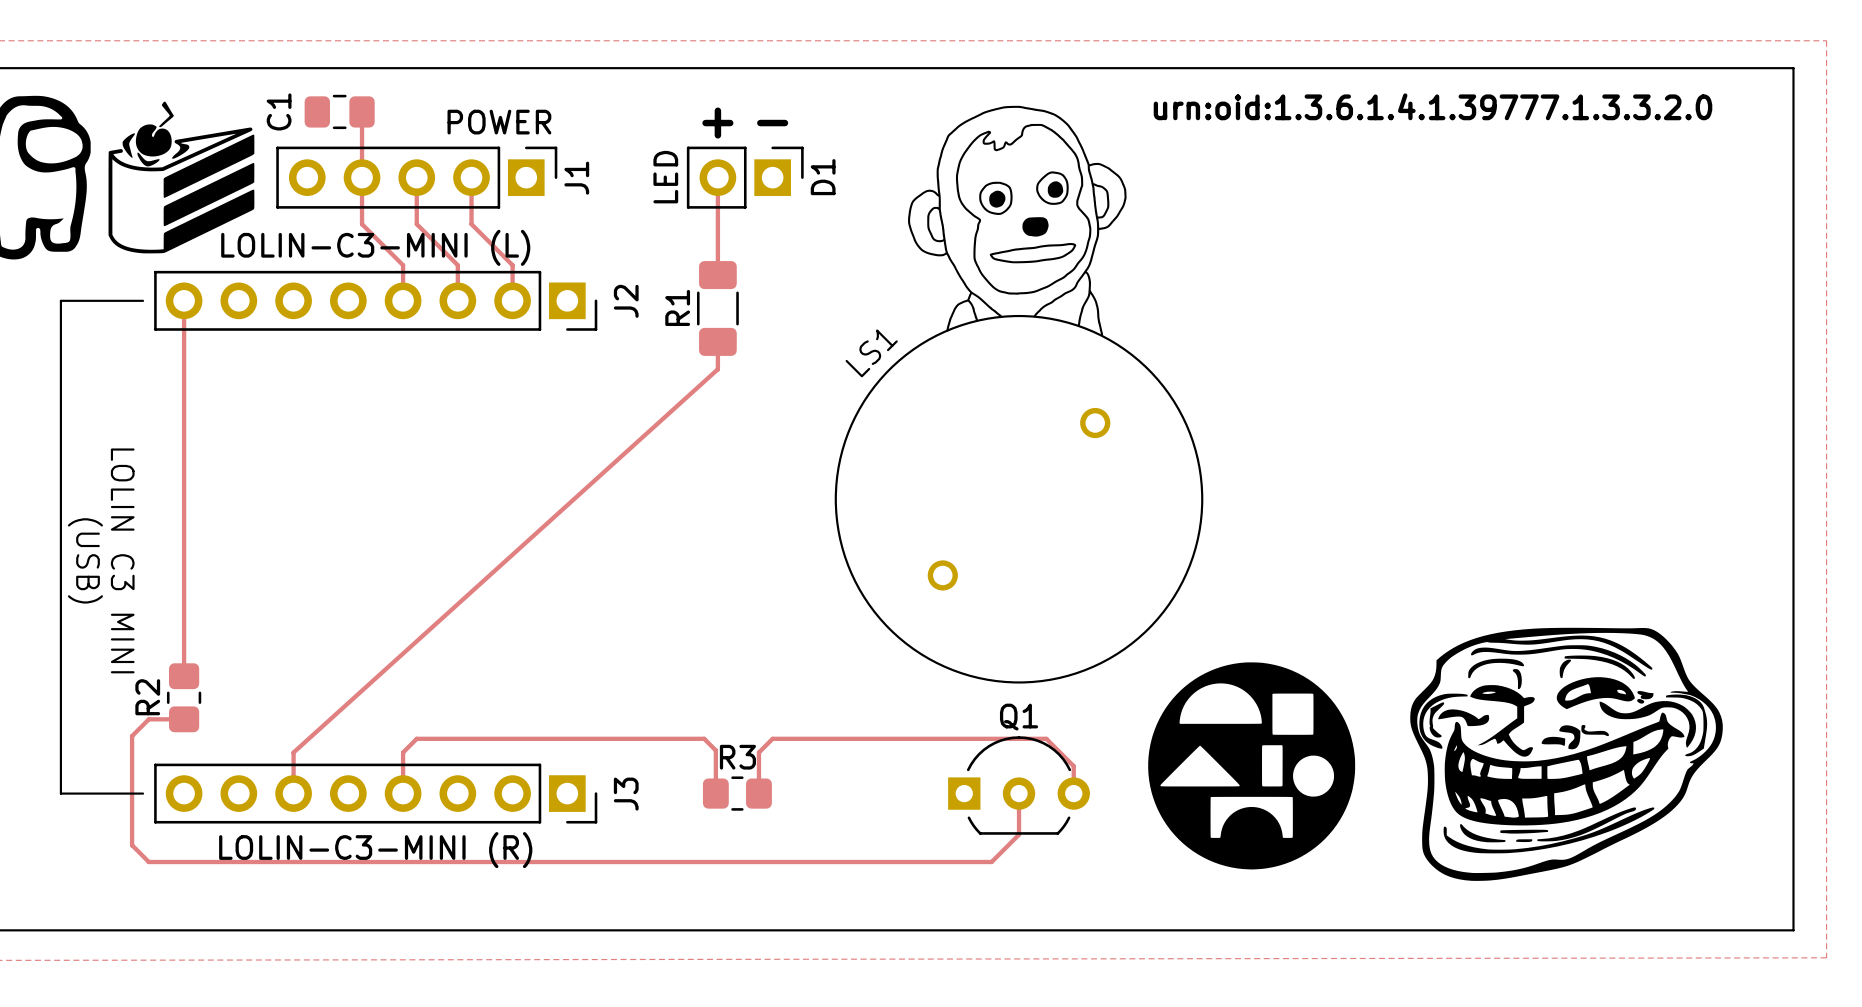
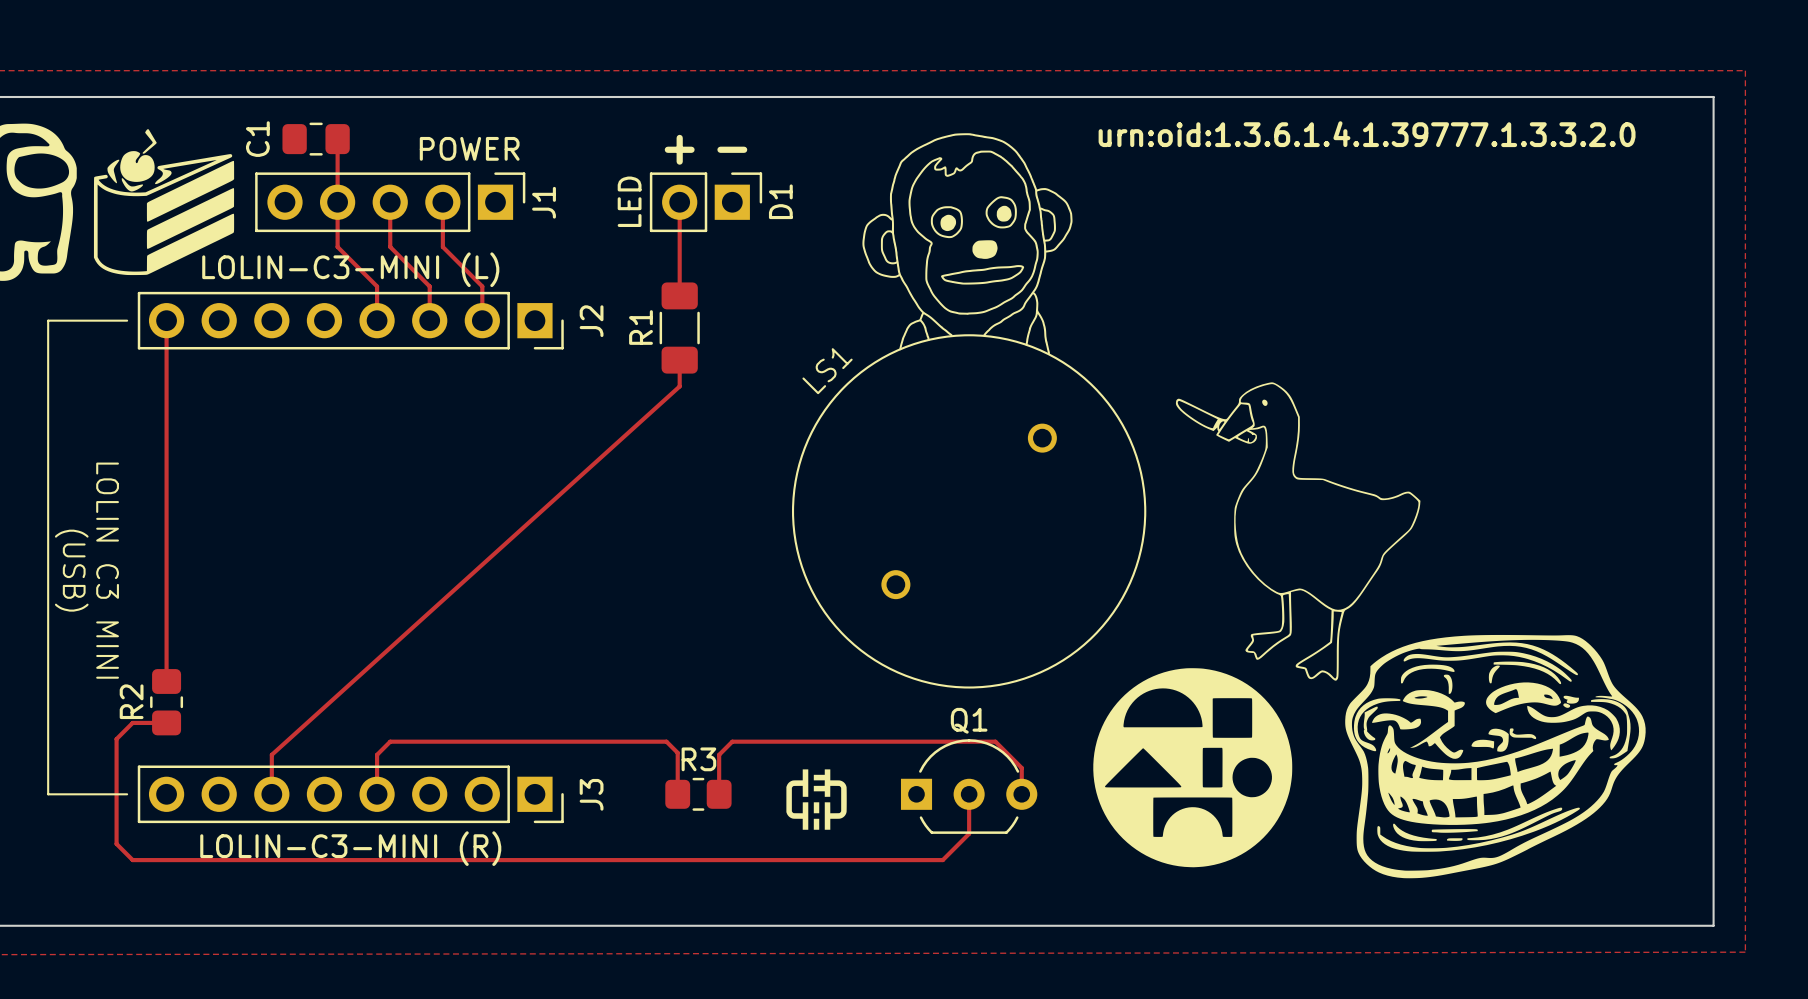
drawing: none -> [1175, 382, 1421, 681]
drawing: none -> [786, 769, 847, 830]

